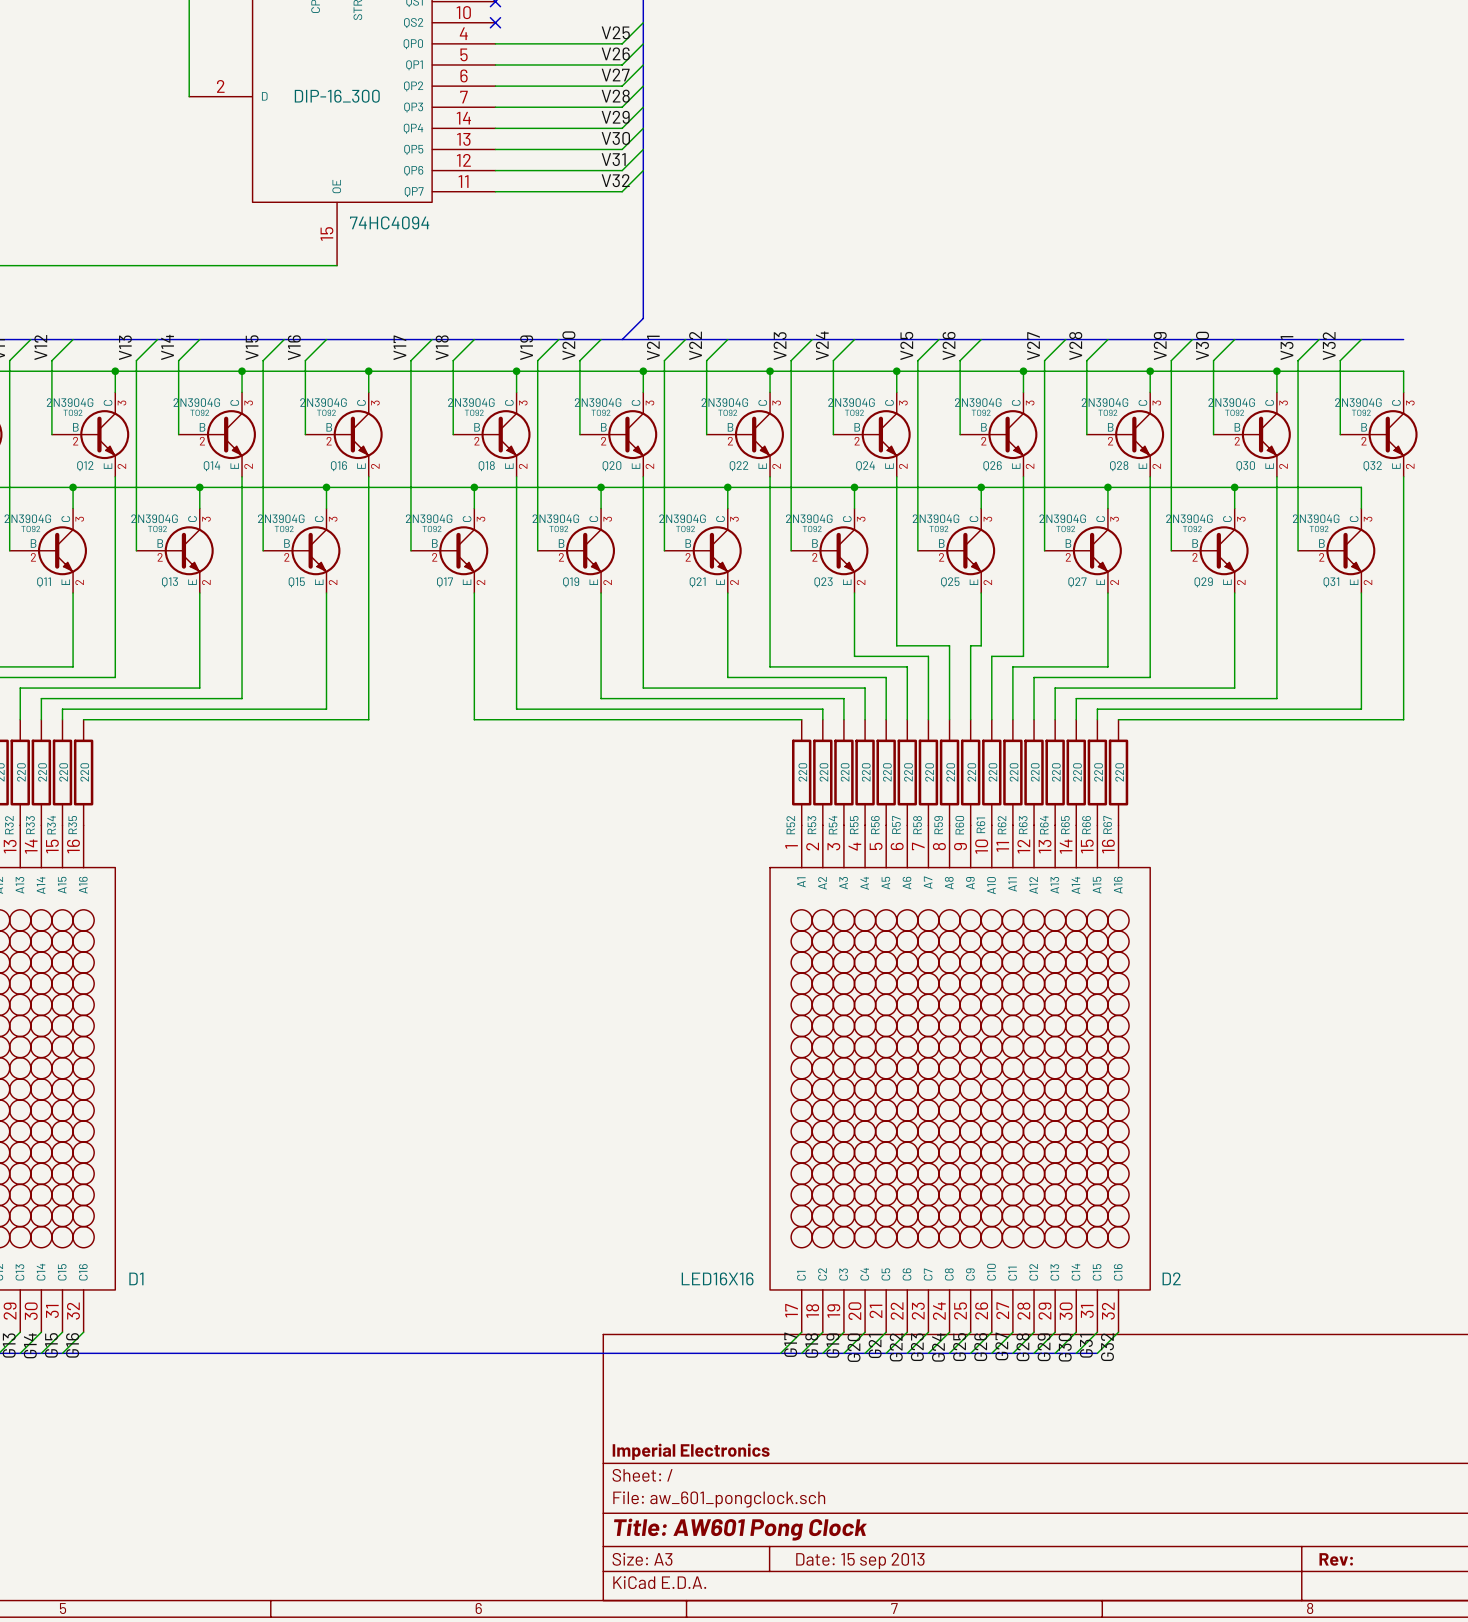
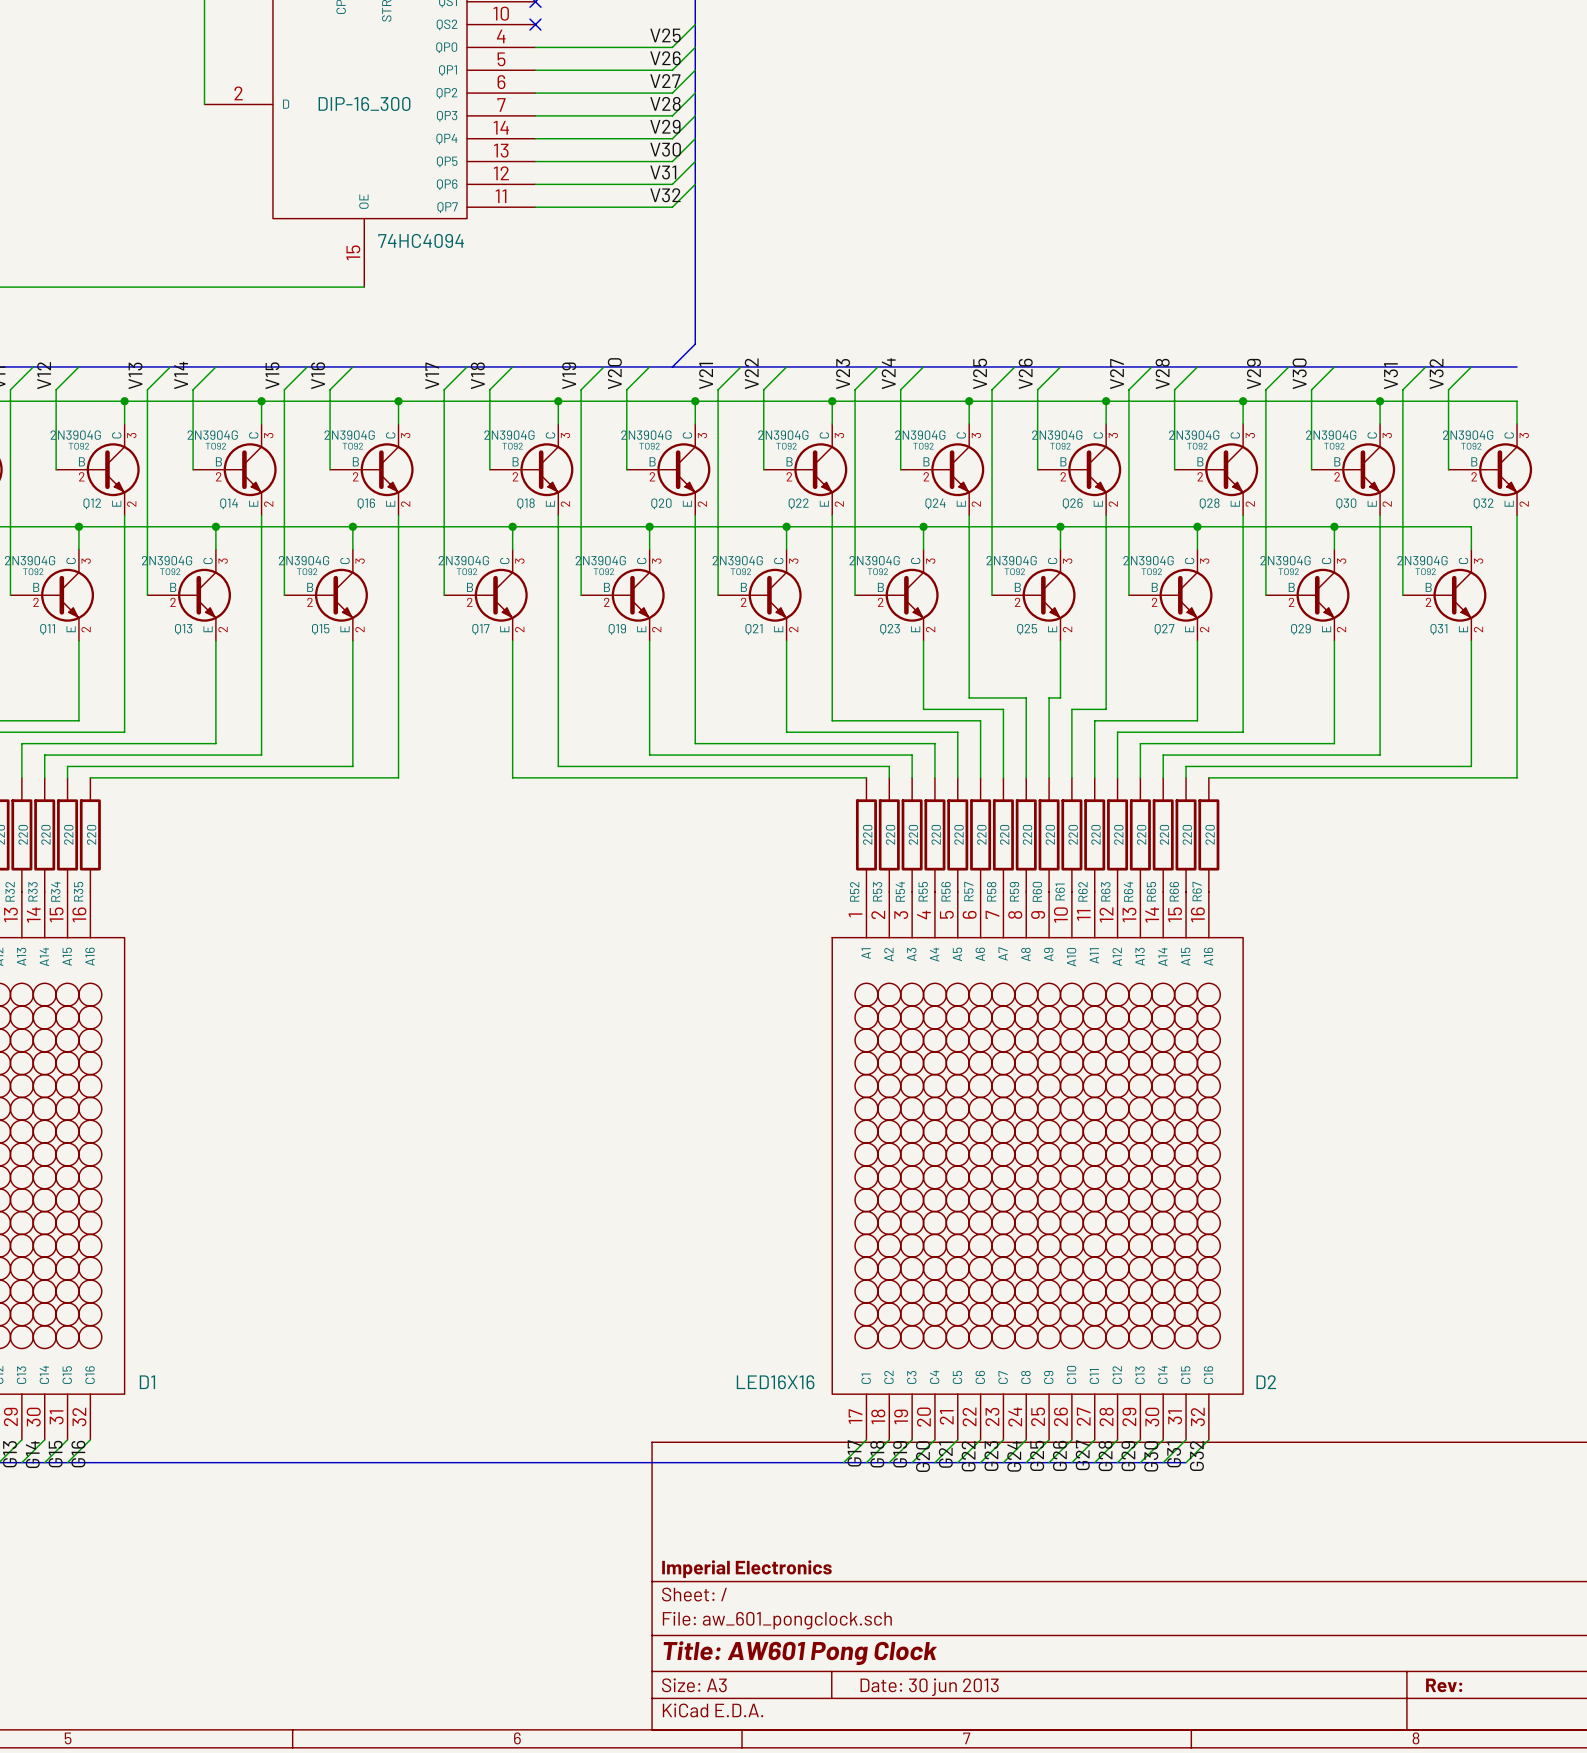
title block: Date: 15 sep 2013 (860, 1561) -> Date: 30 jun 2013 (929, 1687)

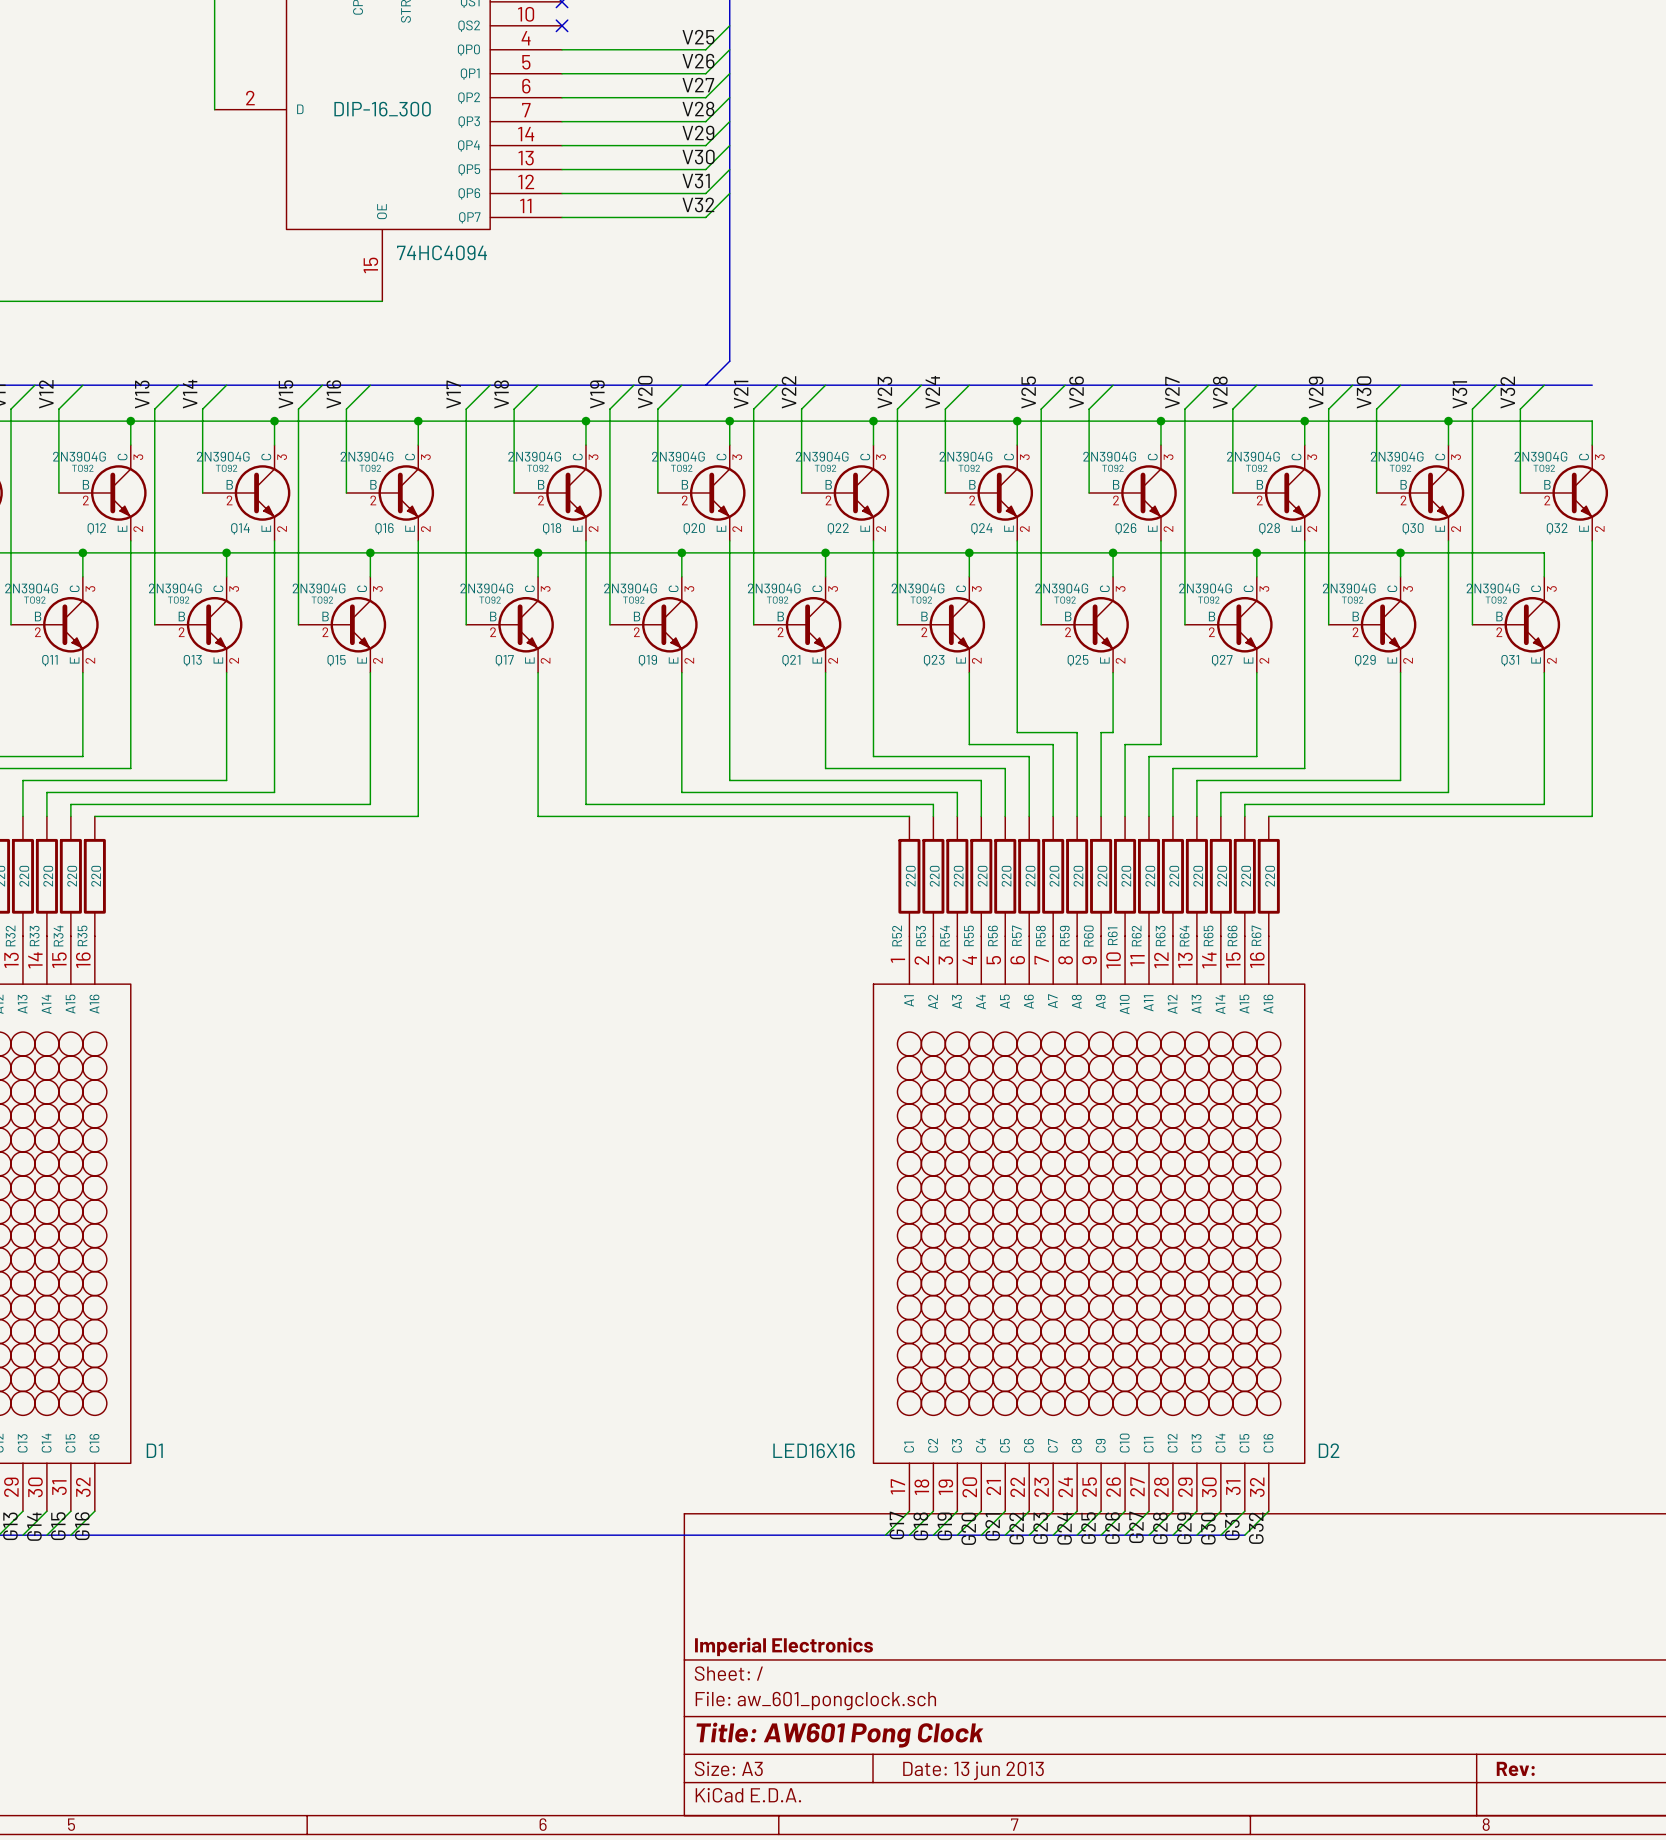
title block: Date: 30 jun 2013 (929, 1687) -> Date: 13 jun 2013 (973, 1770)

